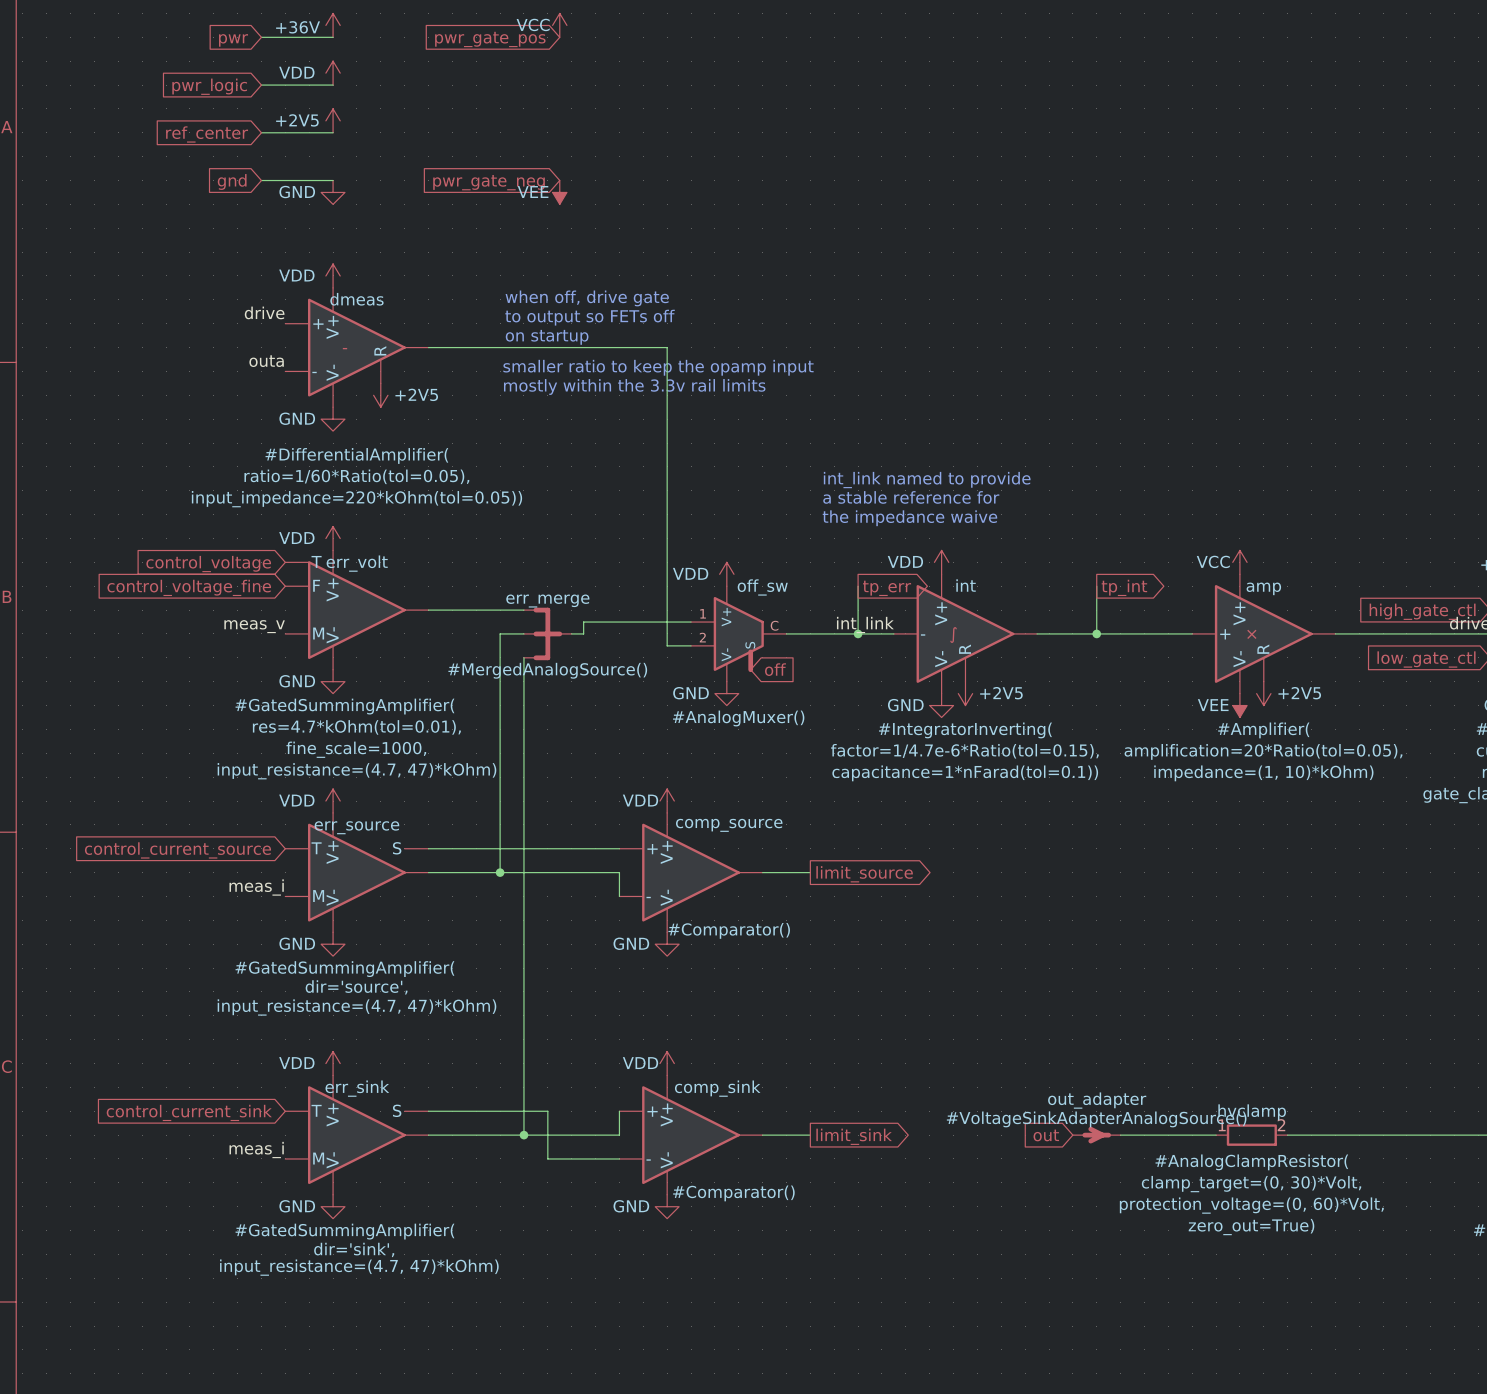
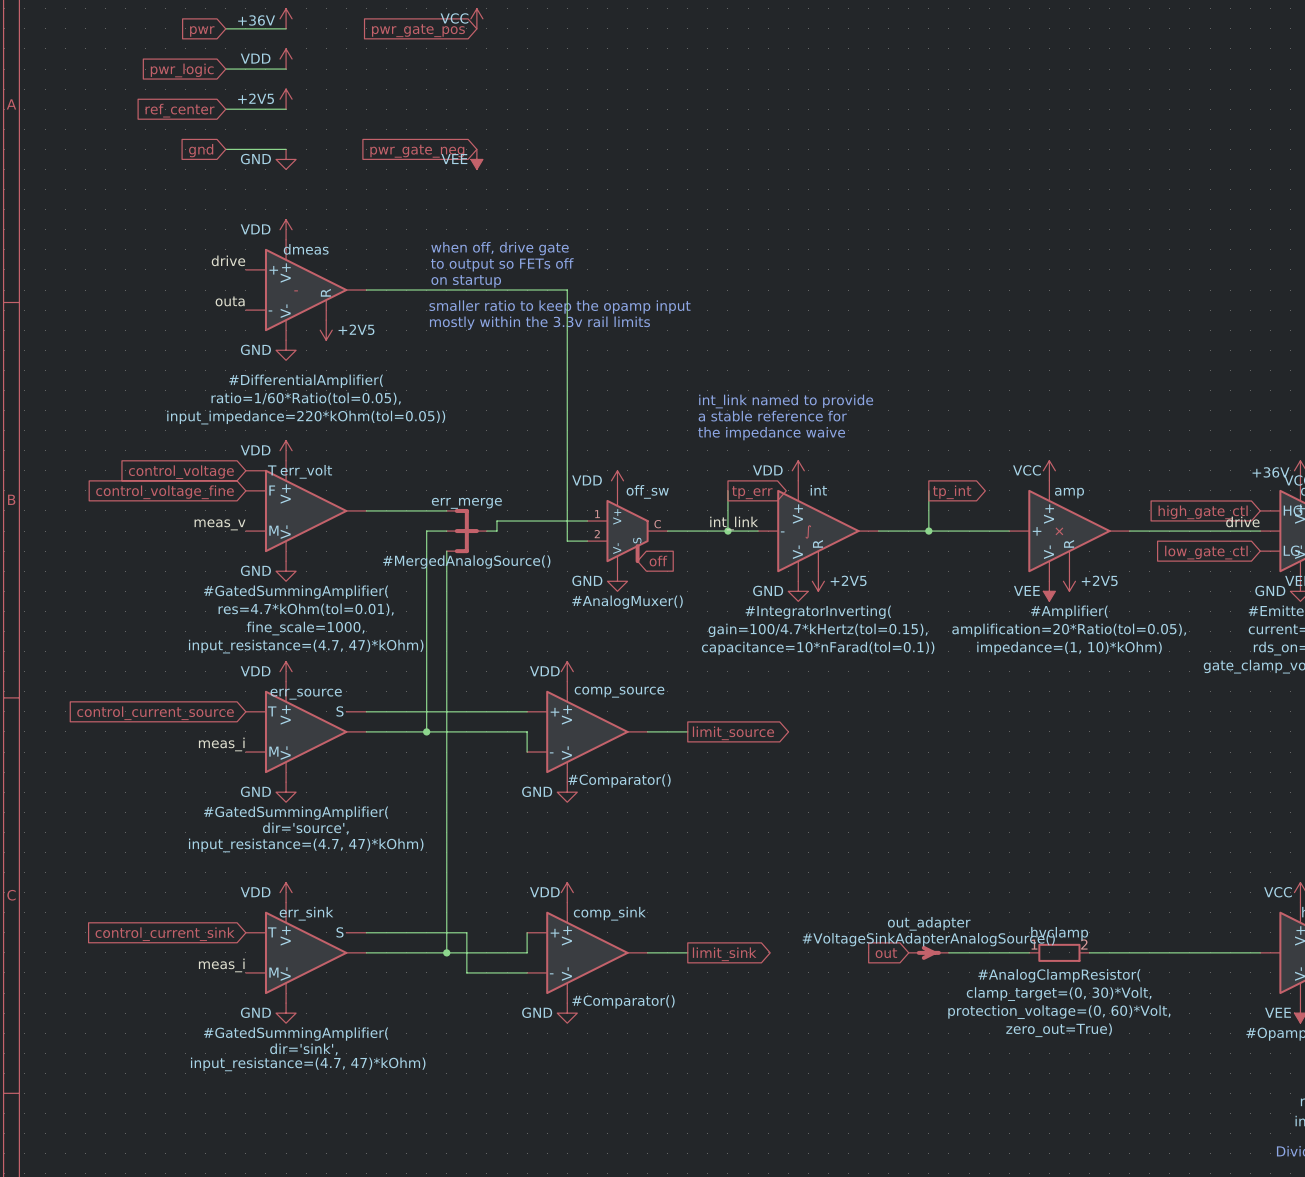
int text: factor=1/4.7e-6*Ratio(tol=0.15), (964, 751) -> gain=100/4.7*kHertz(tol=0.15), (818, 630)
int text: capacitance=1*nFarad(tol=0.1)) (965, 773) -> capacitance=10*nFarad(tol=0.1)) (818, 648)

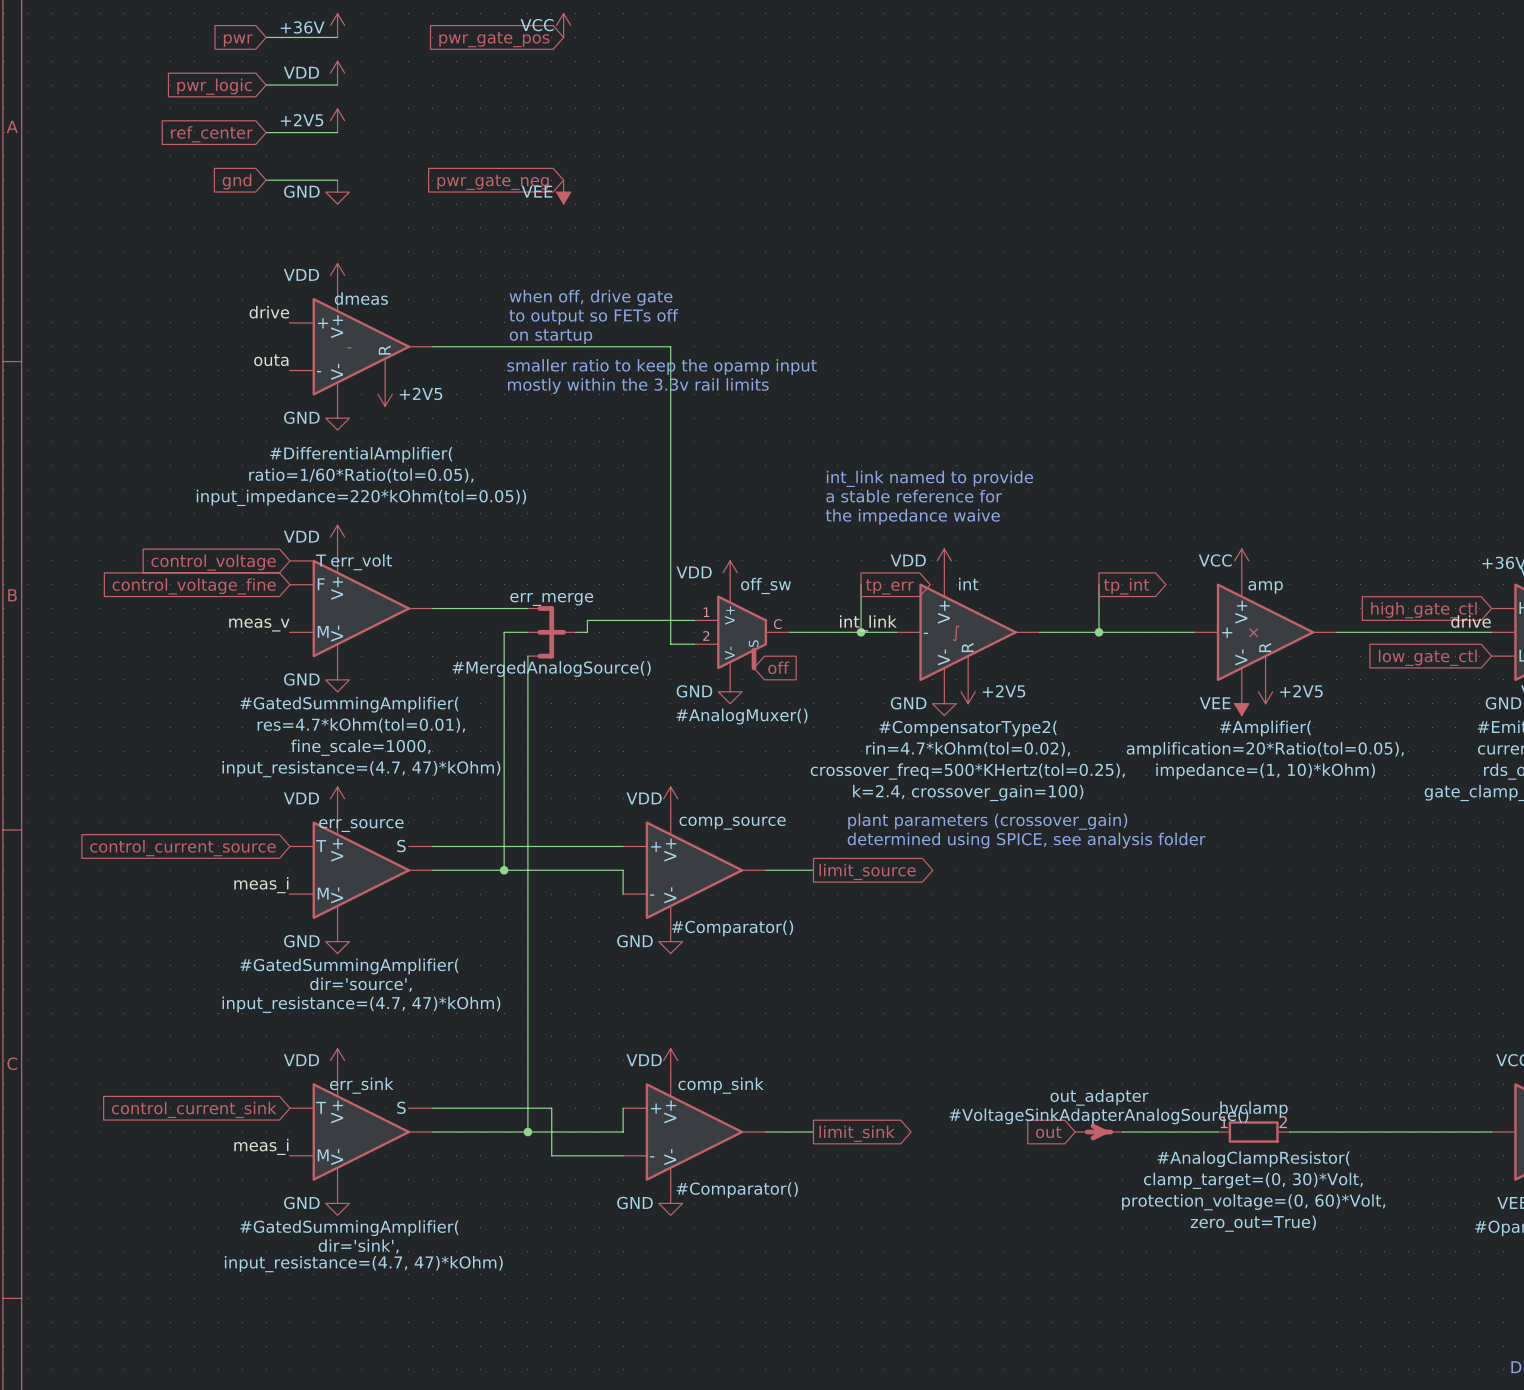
int value: #IntegratorInverting( (818, 612) -> #CompensatorType2( (968, 728)
int text: gain=100/4.7*kHertz(tol=0.15), (818, 630) -> rin=4.7*kOhm(tol=0.02), (968, 749)
int text: capacitance=10*nFarad(tol=0.1)) (818, 648) -> crossover_freq=500*KHertz(tol=0.25), (967, 771)
int text: none -> k=2.4, crossover_gain=100) (968, 792)
text: none -> plant parameters (crossover_gain) (987, 821)
text: none -> determined using SPICE, see analysis folder (1026, 840)

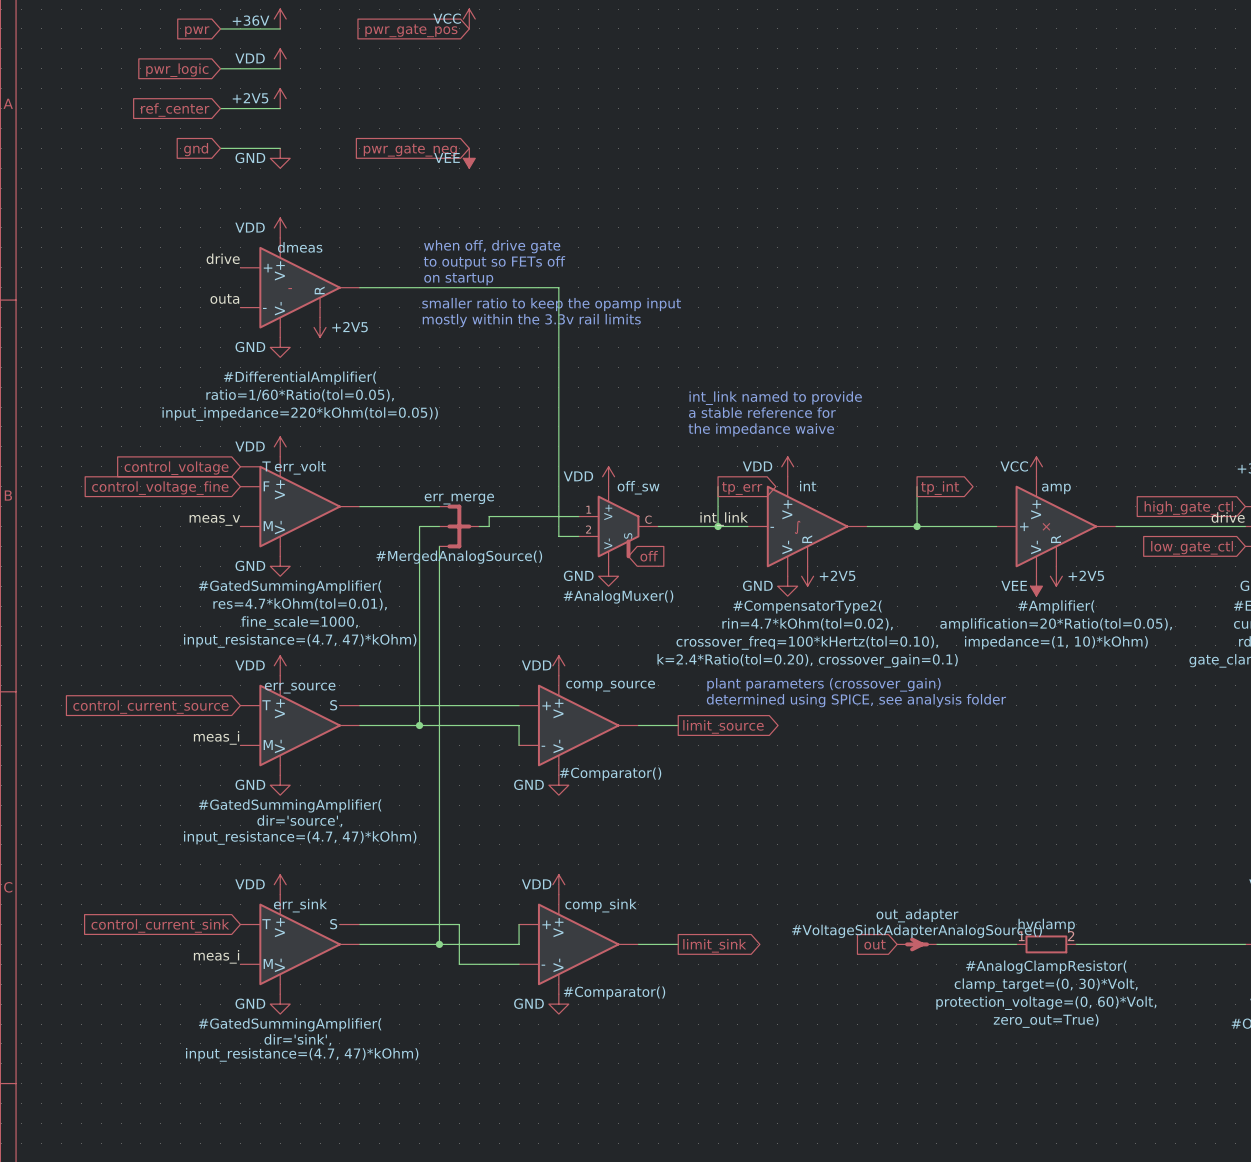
int text: crossover_freq=500*KHertz(tol=0.25), (967, 771) -> crossover_freq=100*kHertz(tol=0.10), (807, 642)
int text: k=2.4, crossover_gain=100) (968, 792) -> none
int text: none -> k=2.4*Ratio(tol=0.20), crossover_gain=0.1) (807, 660)

